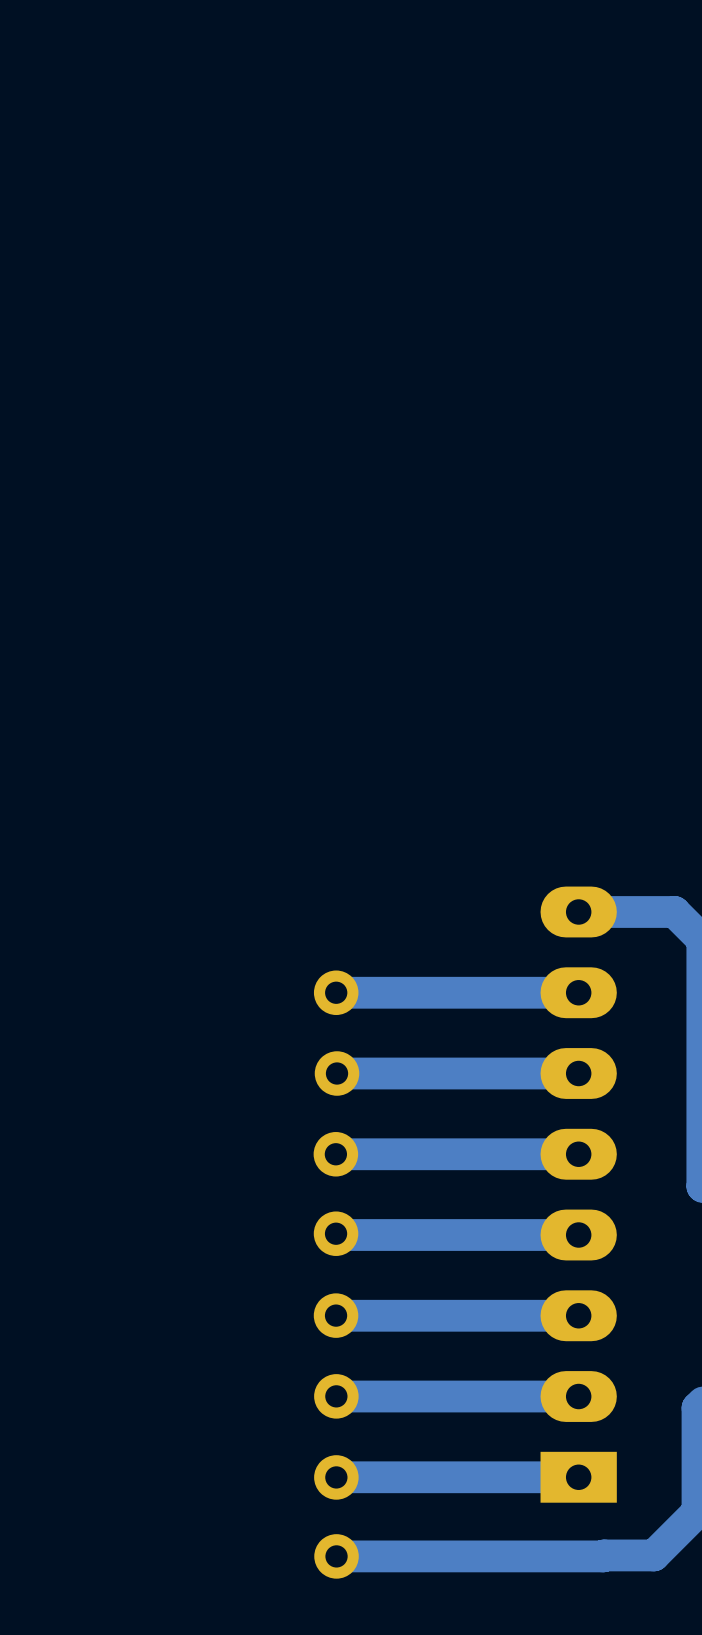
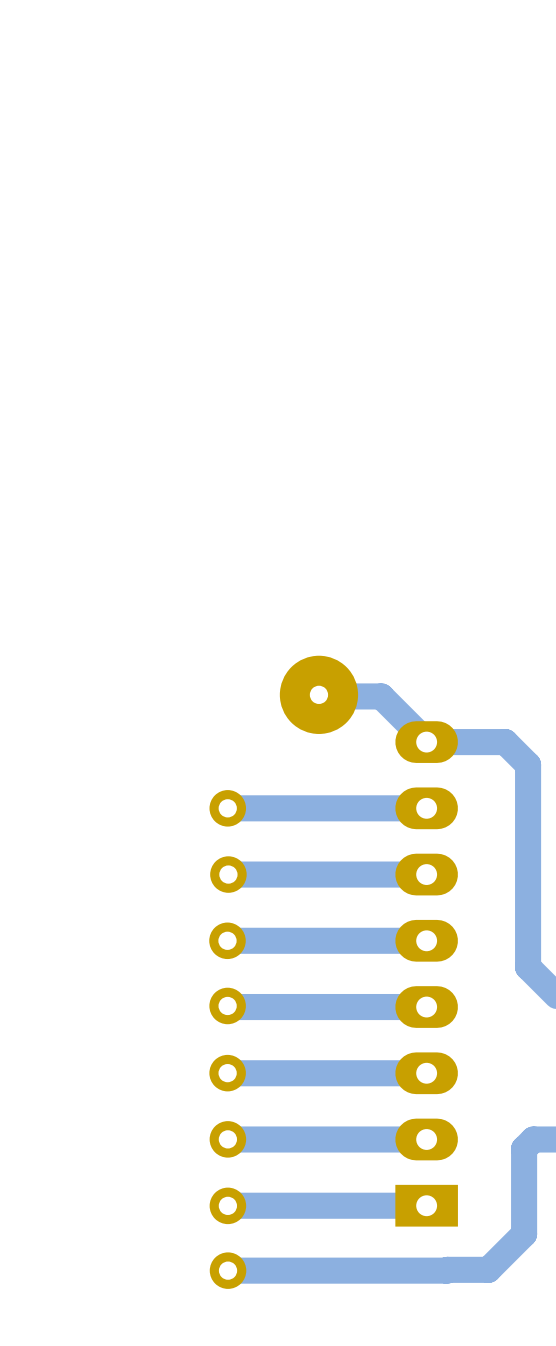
part: none -> (318, 694)
bottom track: none -> (319, 696) (381, 696) (426, 741)

